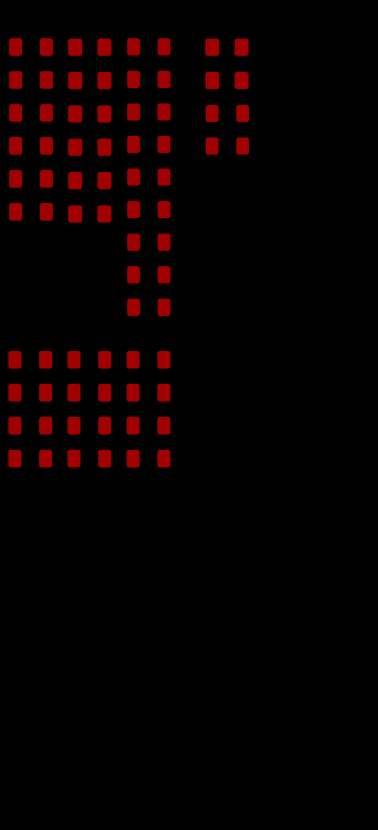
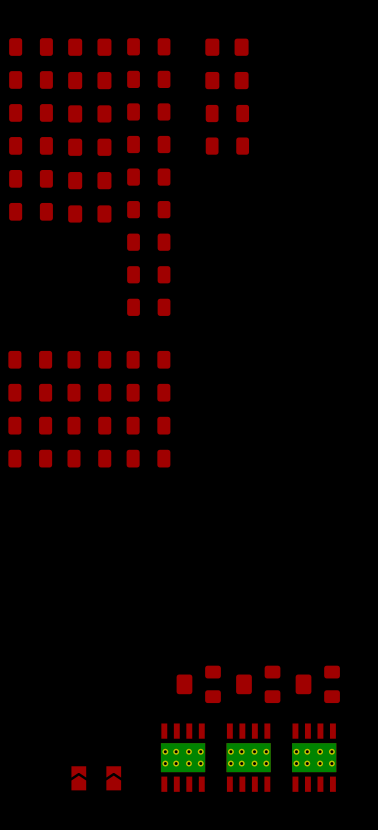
part: none -> (198, 684)
part: none -> (258, 684)
part: none -> (317, 684)
part: none -> (183, 757)
part: none -> (248, 757)
part: none -> (314, 757)
part: none -> (78, 778)
part: none -> (113, 778)

